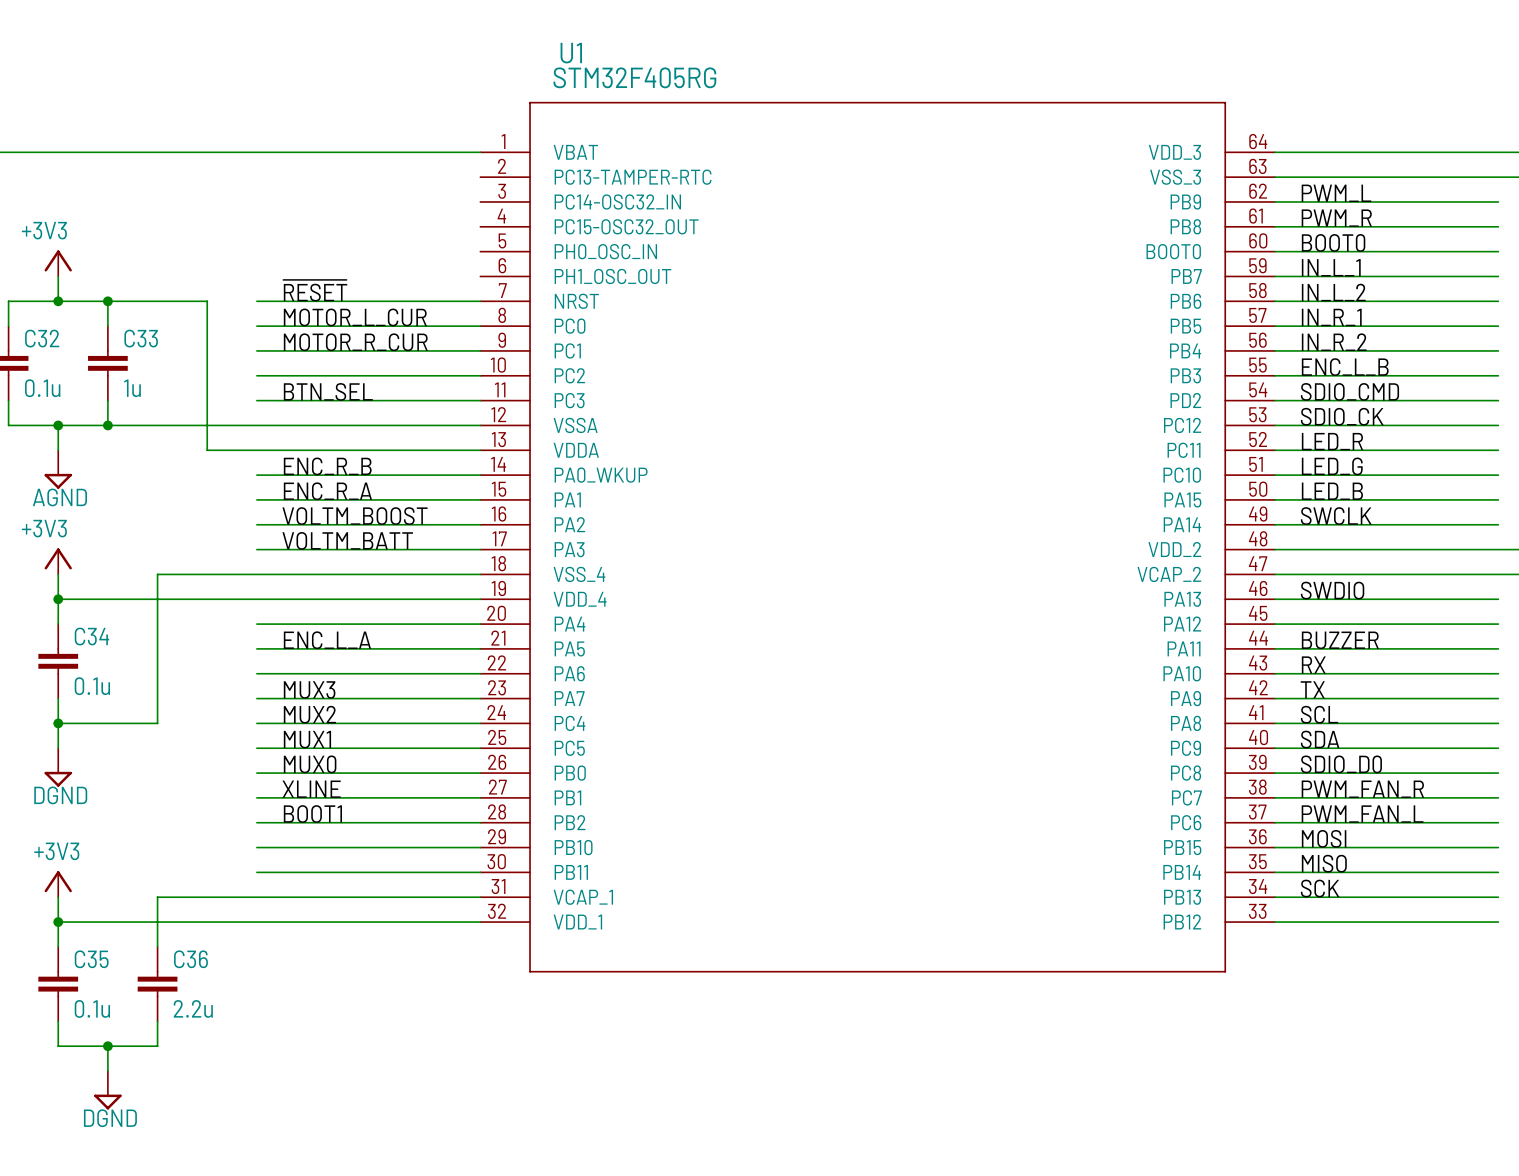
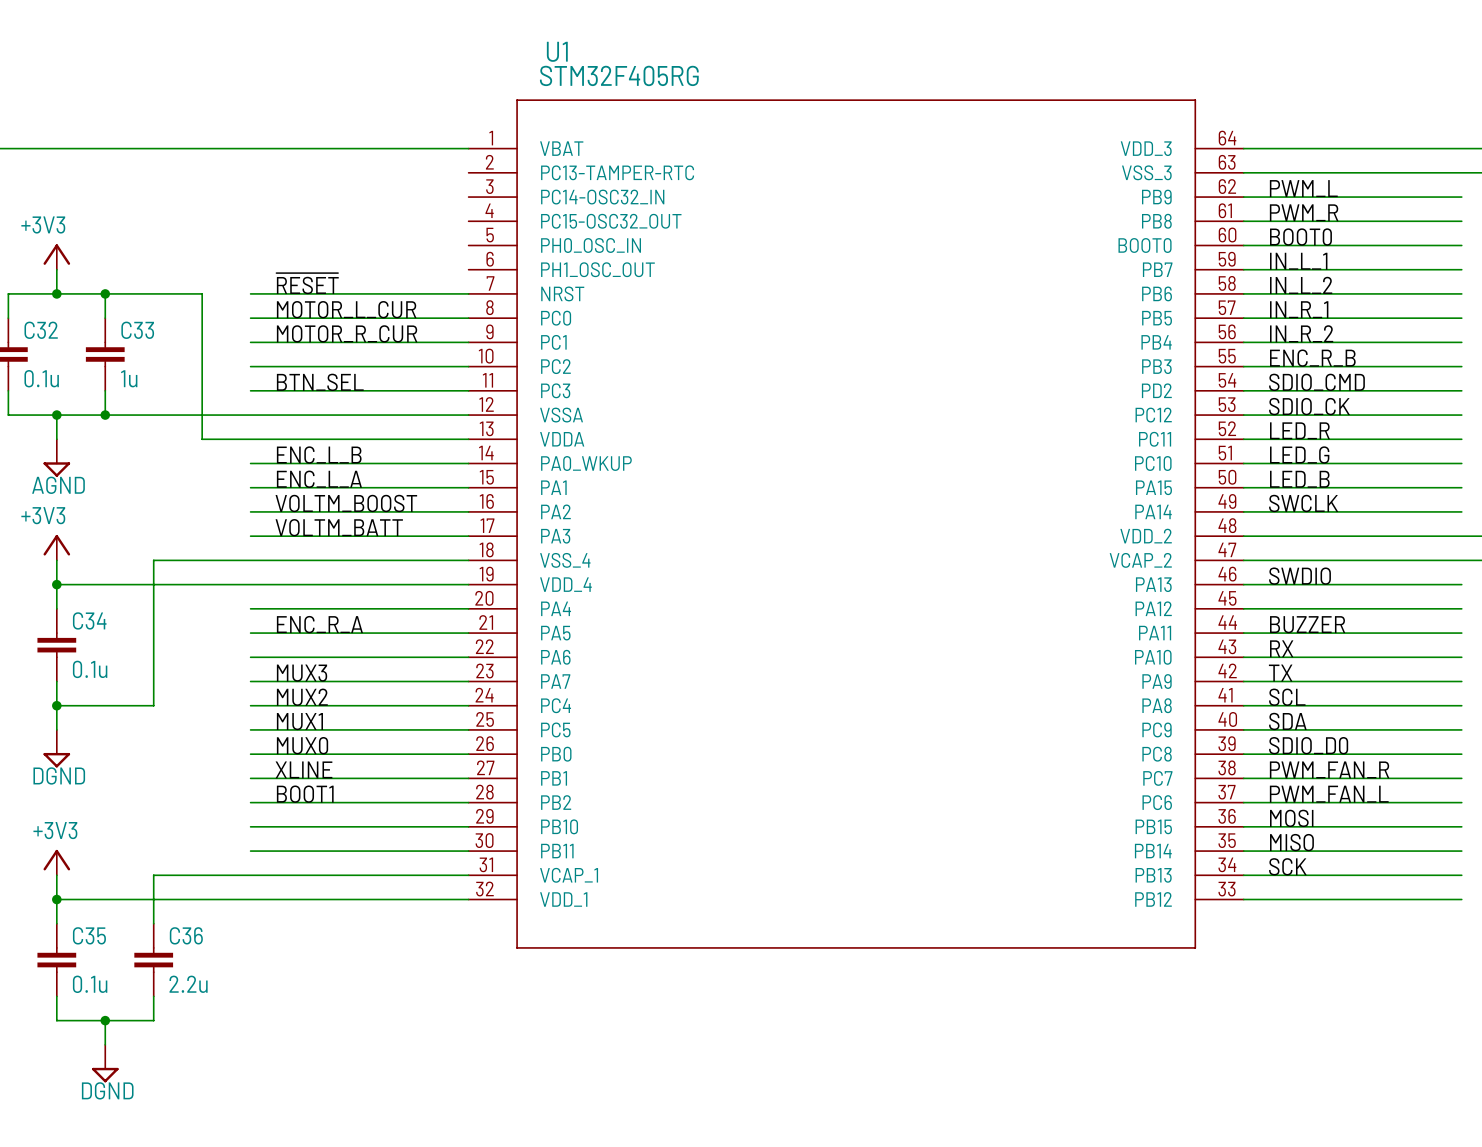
label: ENC_L_B (1345, 367) -> ENC_R_B (1312, 358)
label: ENC_R_B (327, 466) -> ENC_L_B (319, 455)
label: ENC_R_A (327, 491) -> ENC_L_A (319, 479)
label: ENC_L_A (327, 640) -> ENC_R_A (319, 624)

